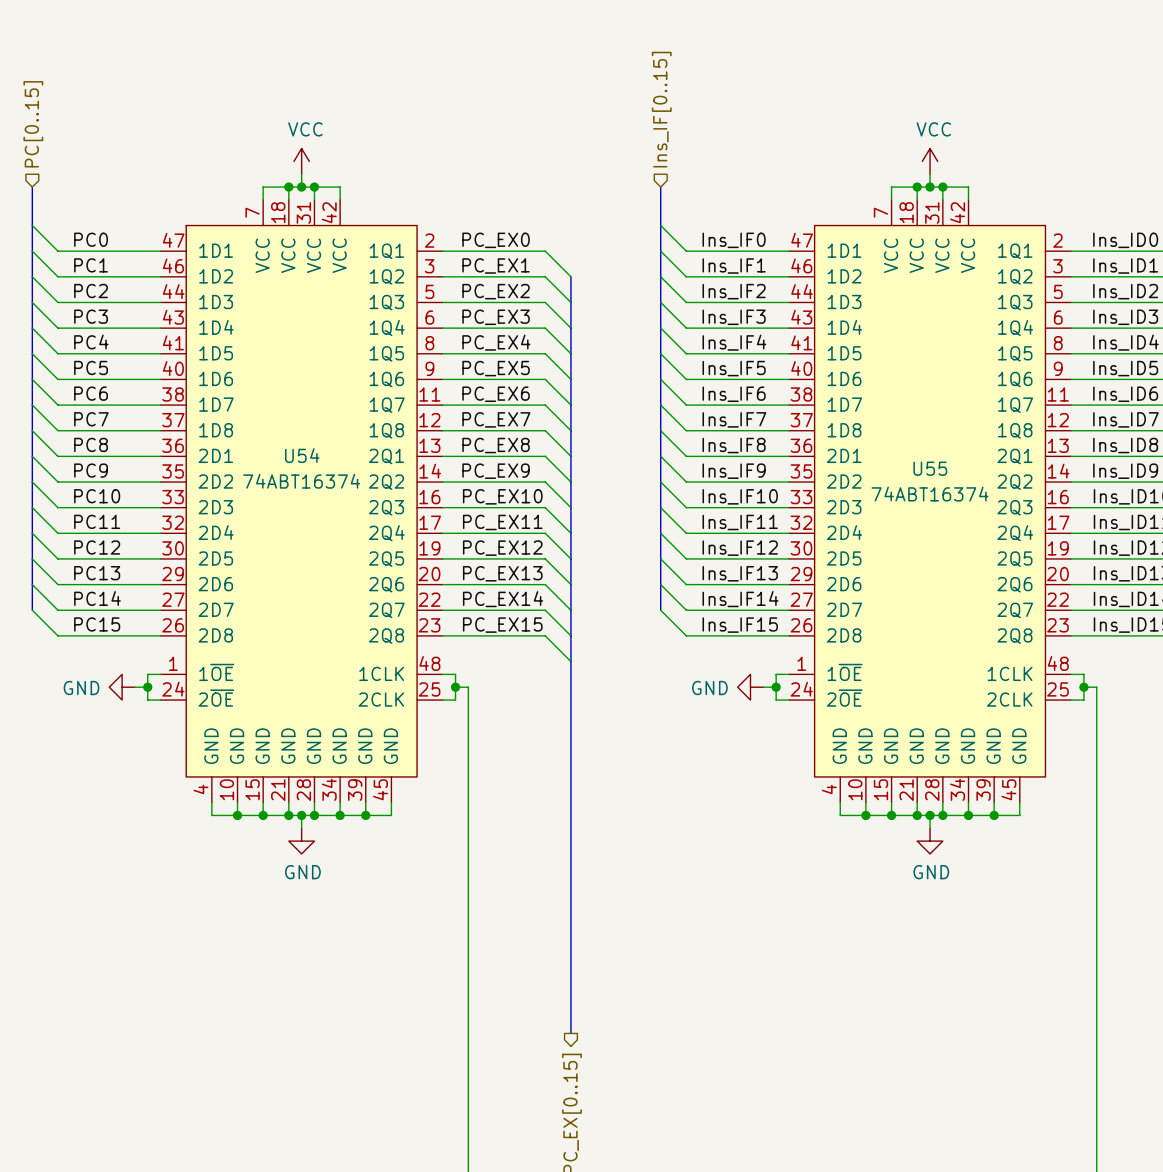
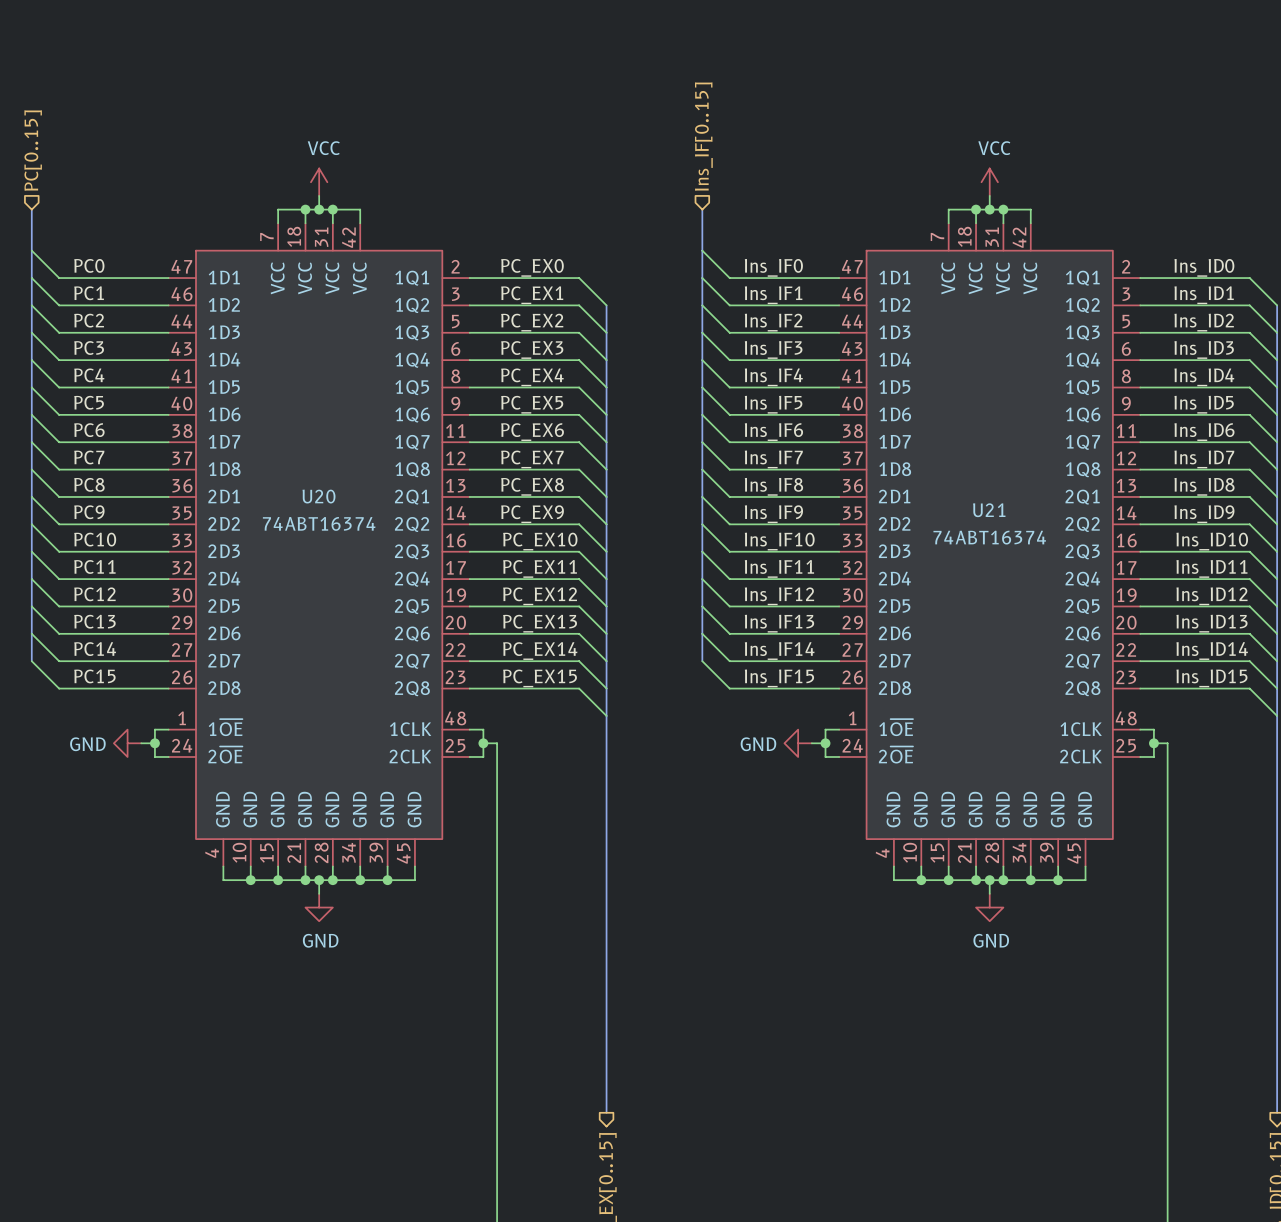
U54 name: U54 (302, 455) -> U20 (318, 496)
U55 name: U55 (930, 468) -> U21 (989, 510)

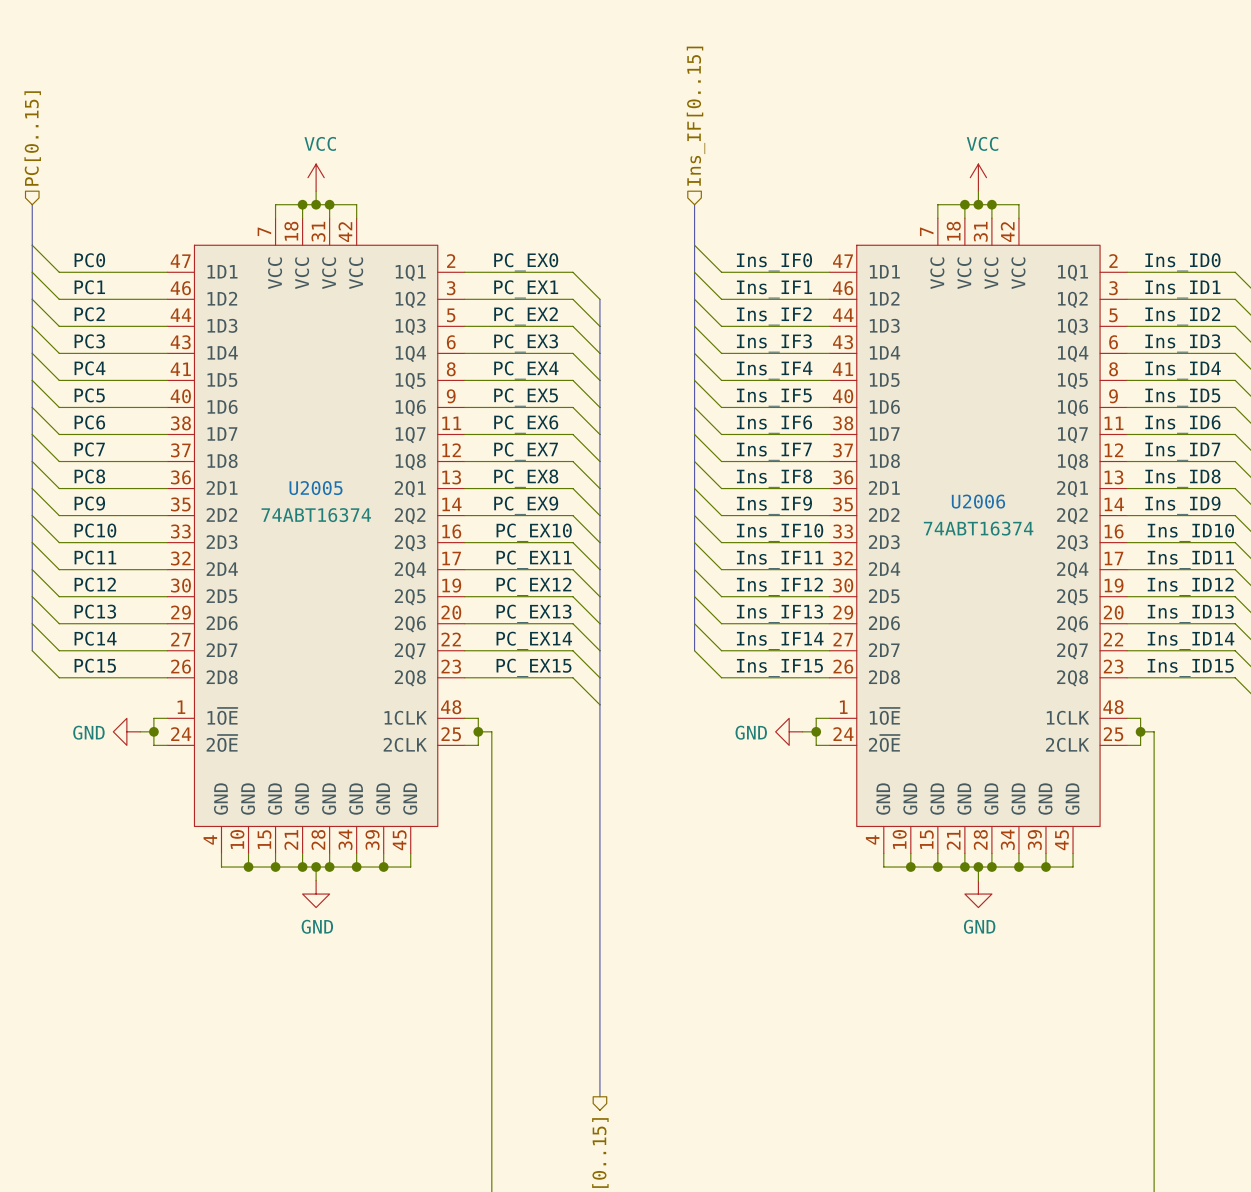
U20 name: U20 (318, 496) -> U2005 (316, 488)
U21 name: U21 (989, 510) -> U2006 (978, 501)

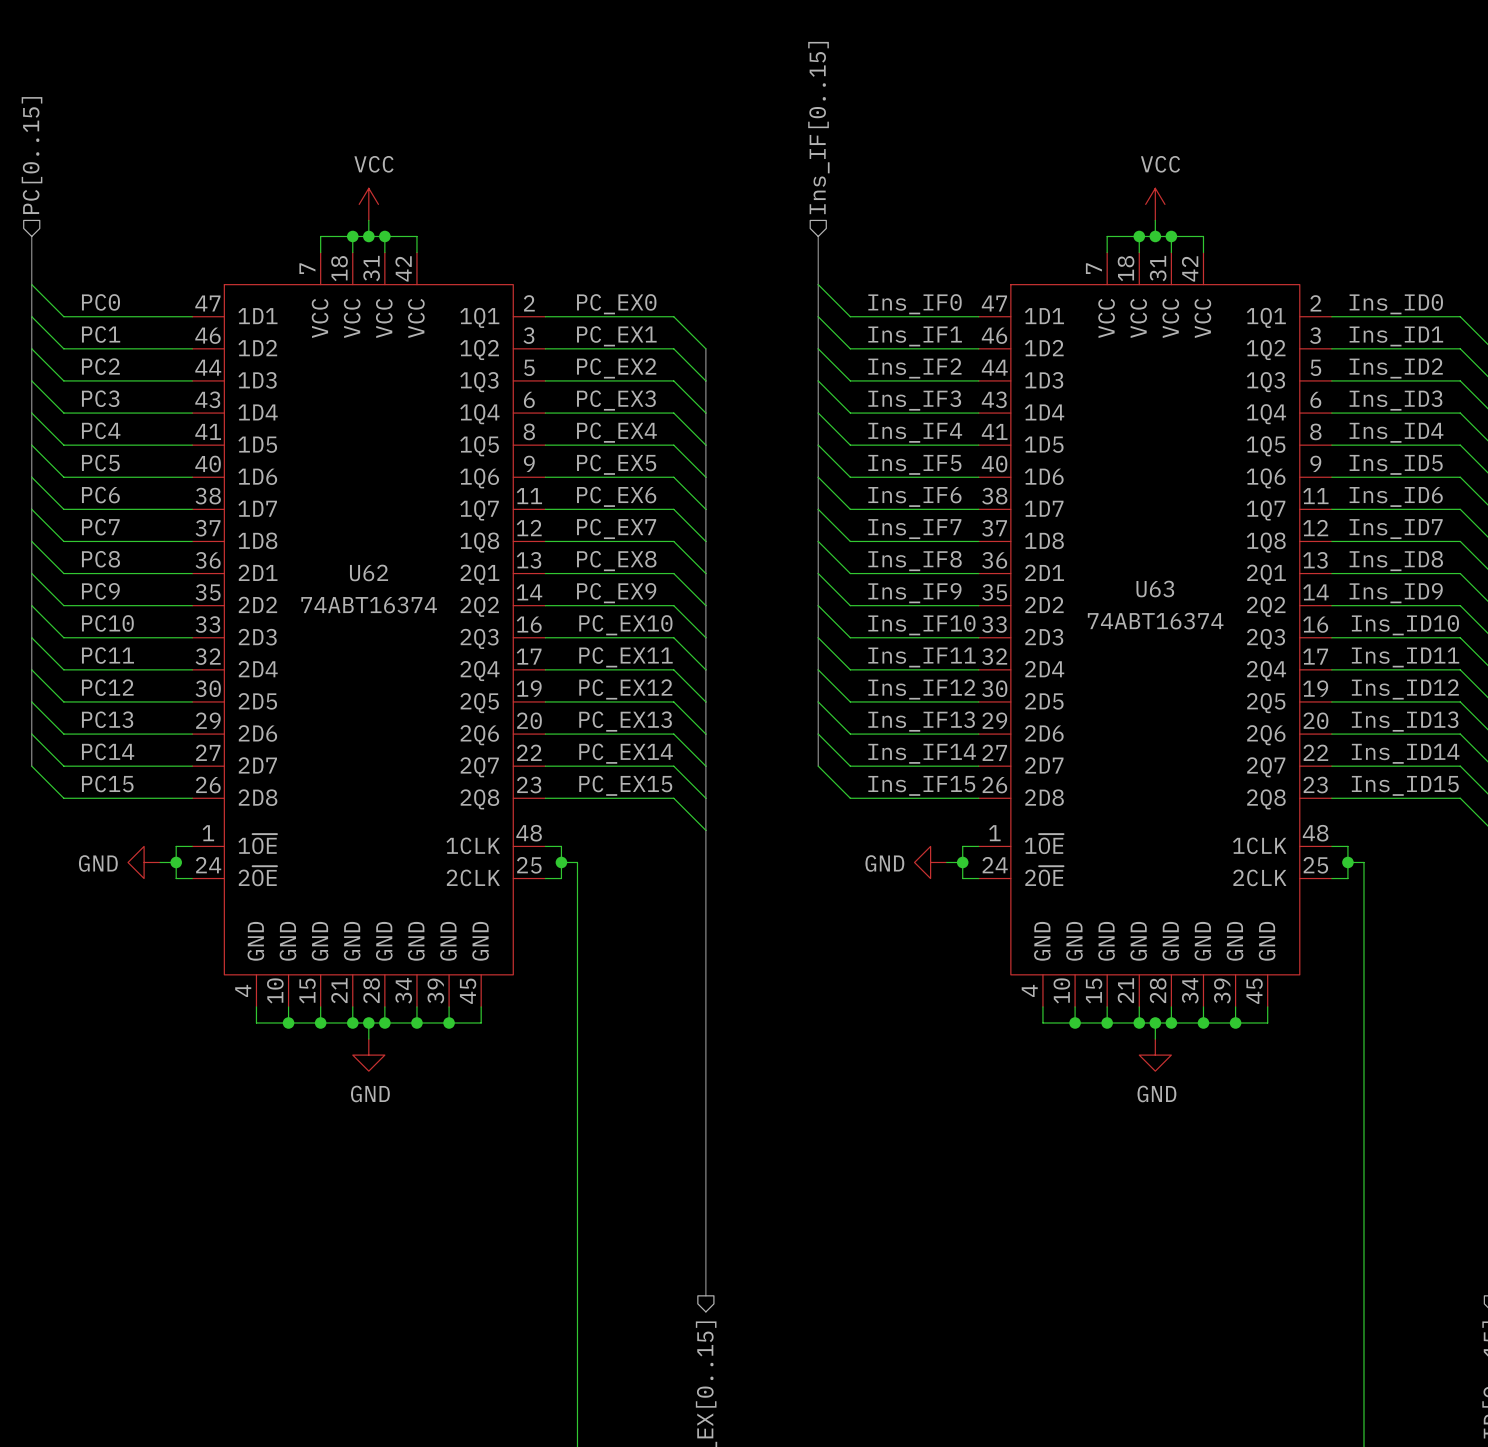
U2005 name: U2005 (316, 488) -> U62 (369, 572)
U2006 name: U2006 (978, 501) -> U63 (1155, 589)

